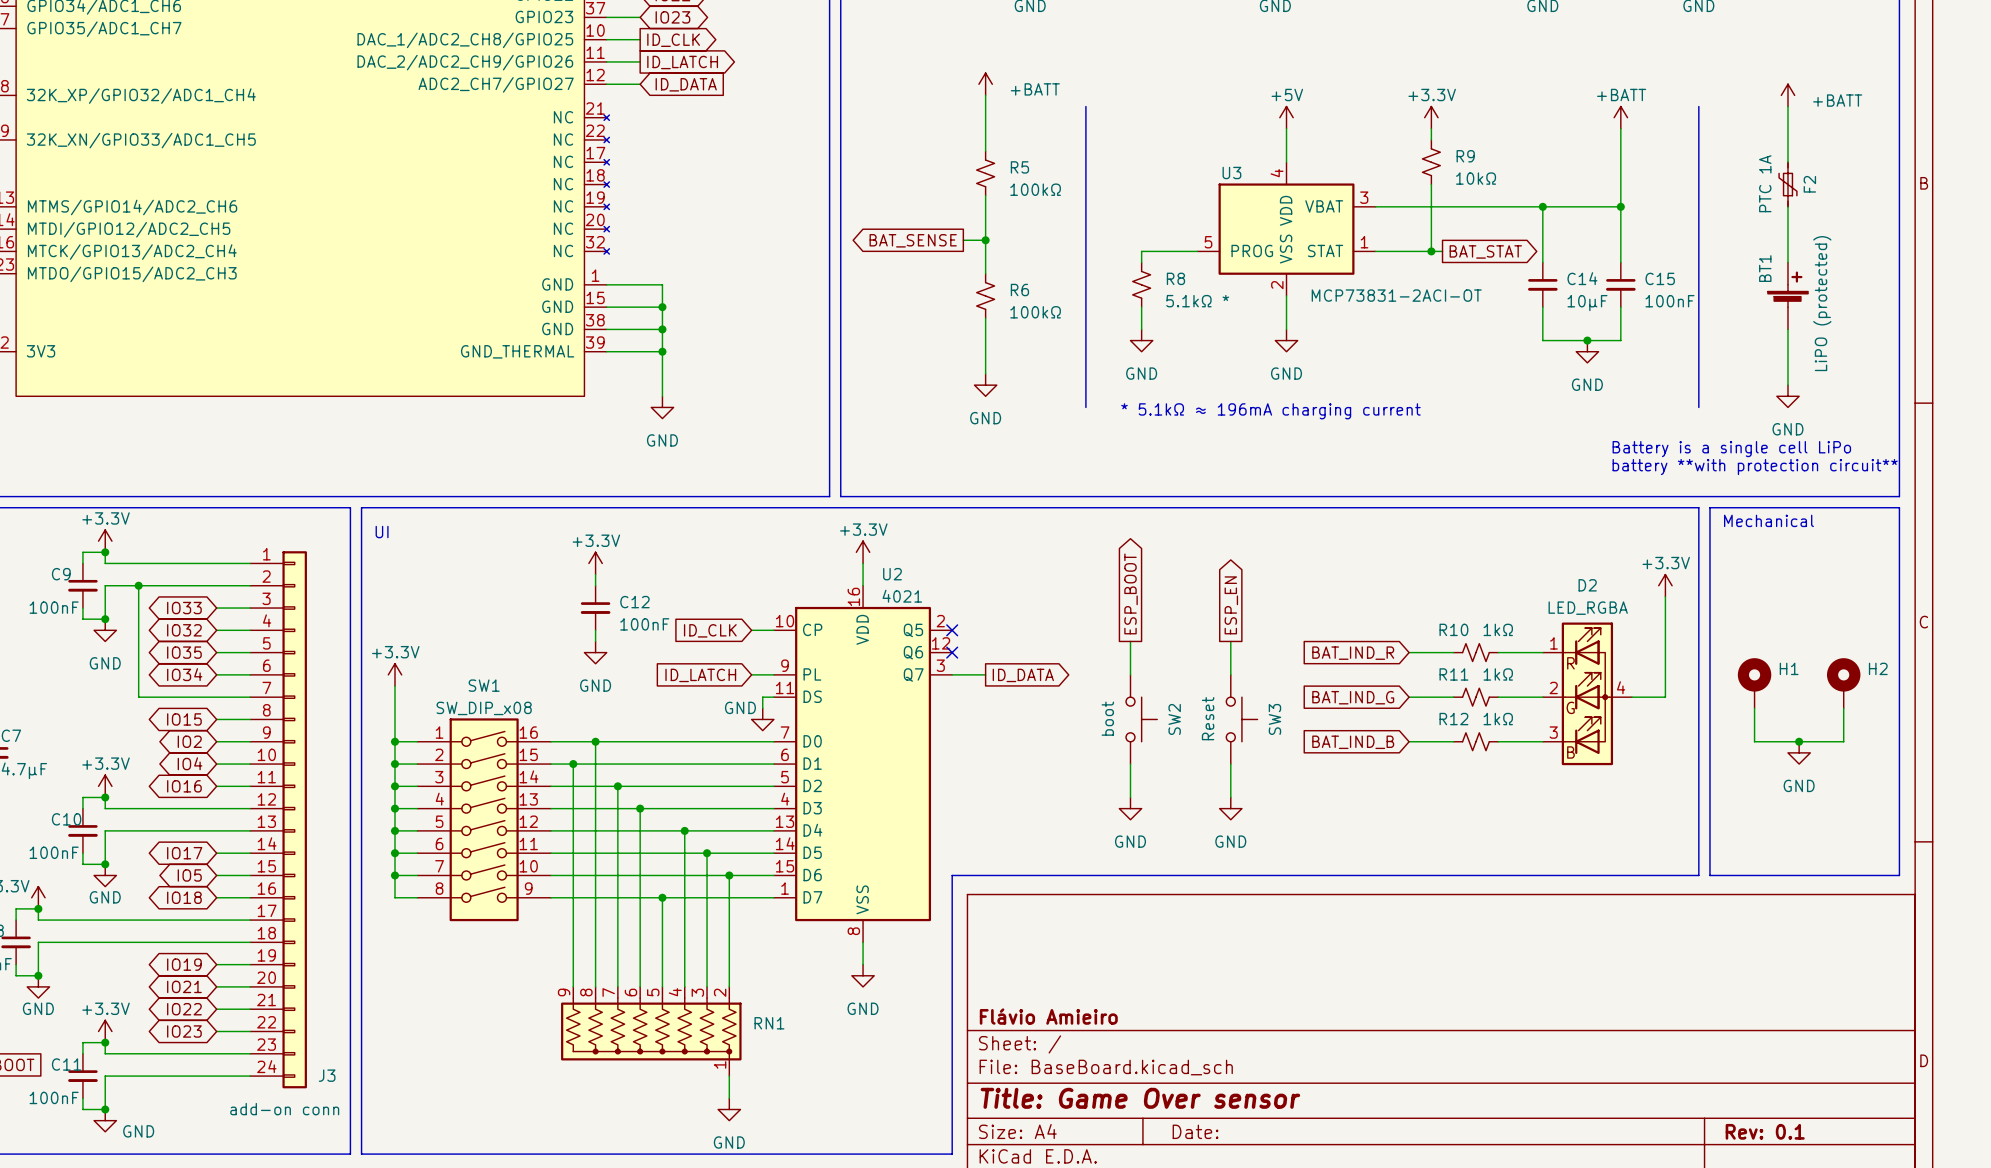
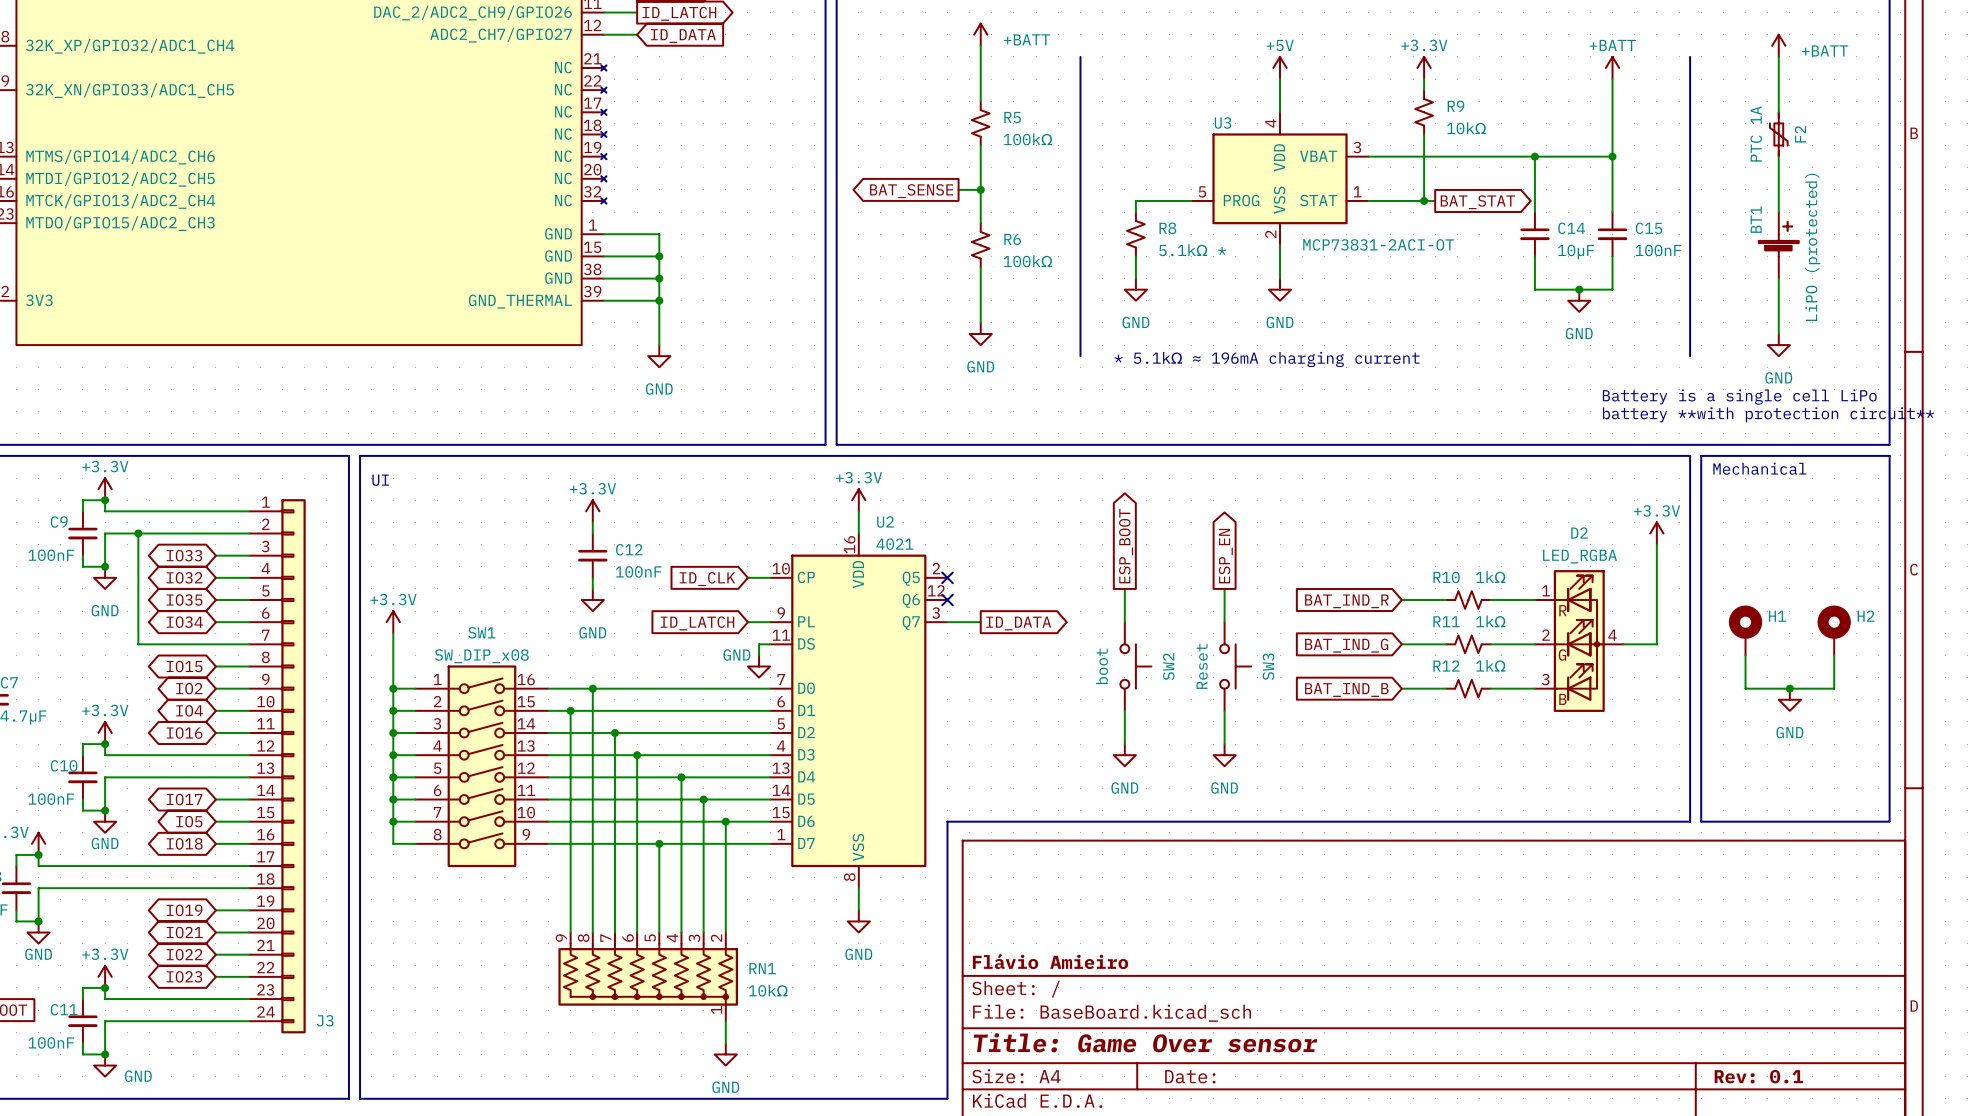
RN1 value: none -> 10kΩ (768, 990)
J3 value: add-on conn (284, 1109) -> none

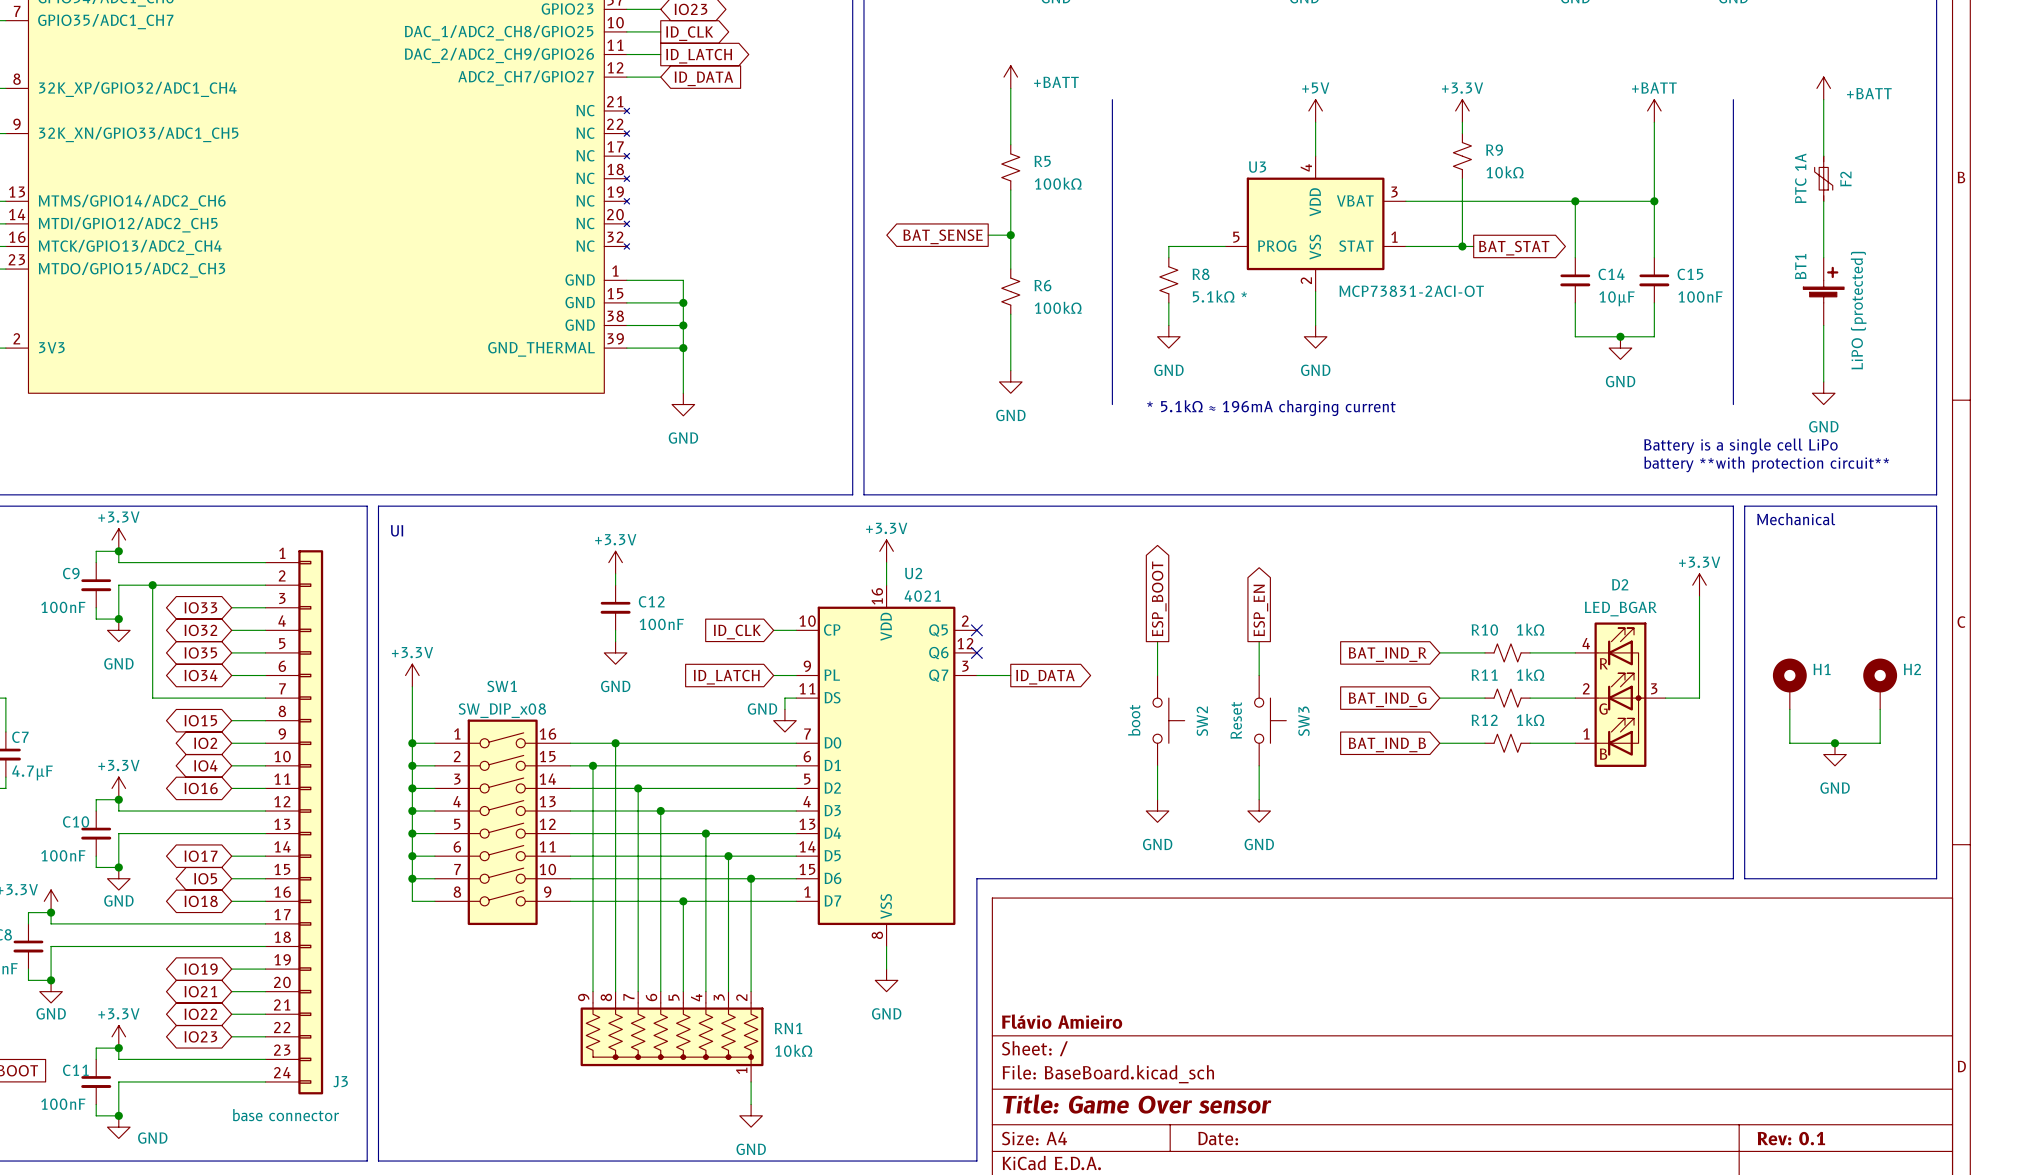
D2 value: LED_RGBA (1579, 556) -> LED_BGAR (1620, 609)
D2 pin number: 1 (1546, 590) -> 4 (1586, 643)
D2 pin number: 4 (1612, 635) -> 3 (1654, 688)
D2 pin number: 3 (1545, 679) -> 1 (1586, 733)
J3 value: none -> base connector (286, 1115)

